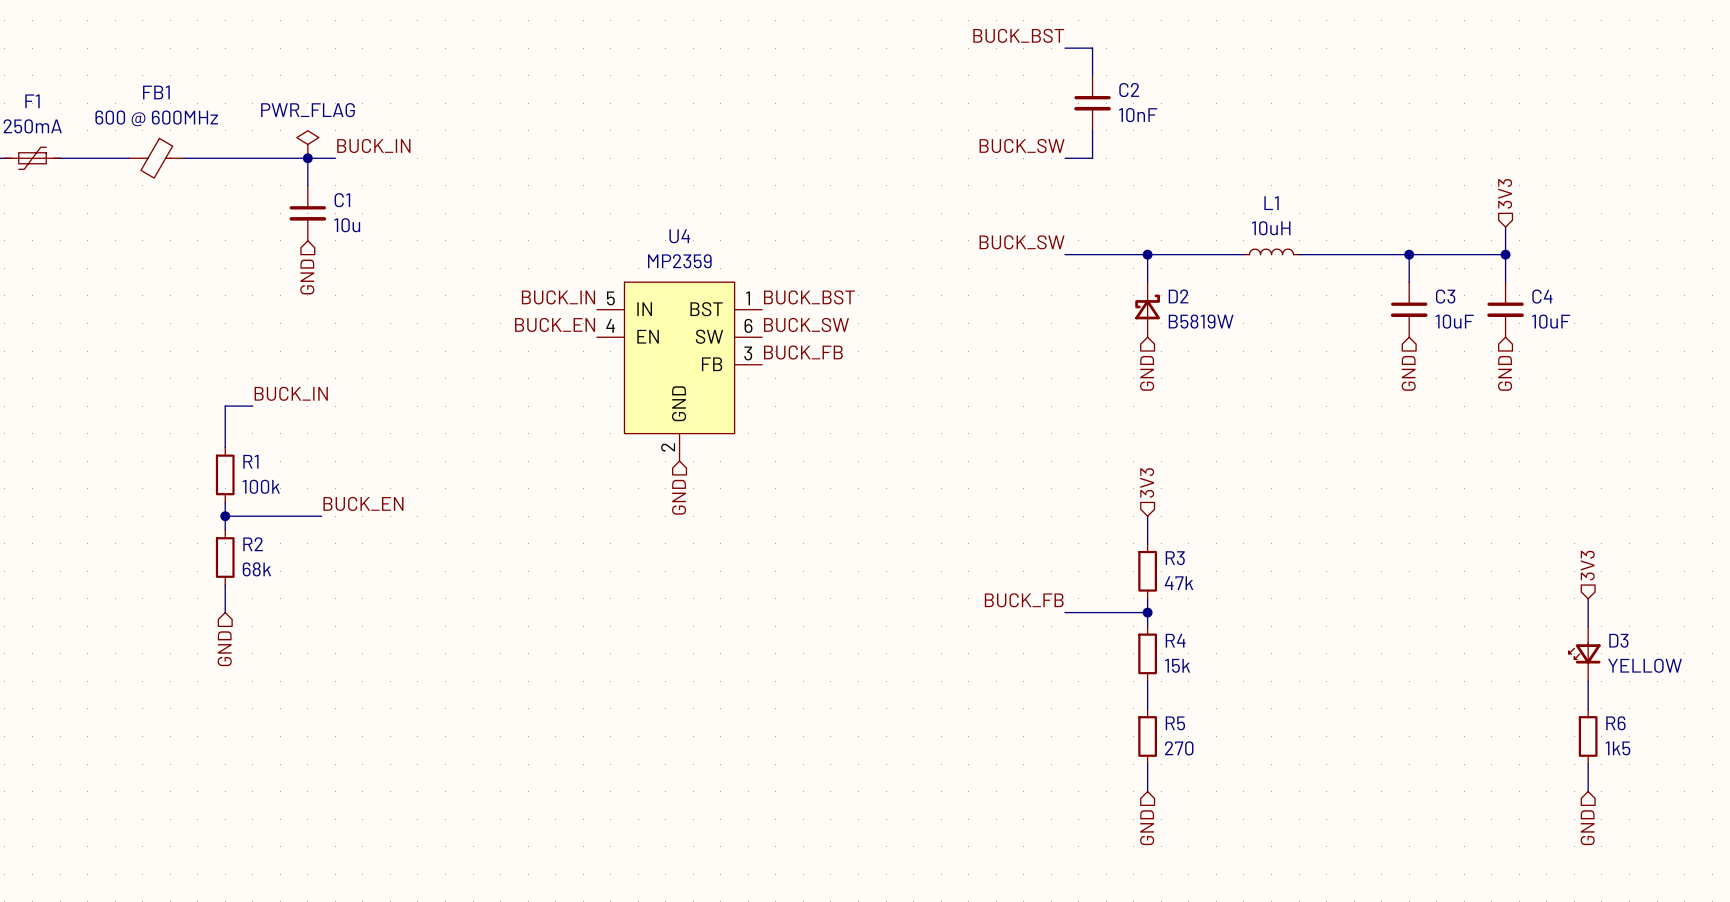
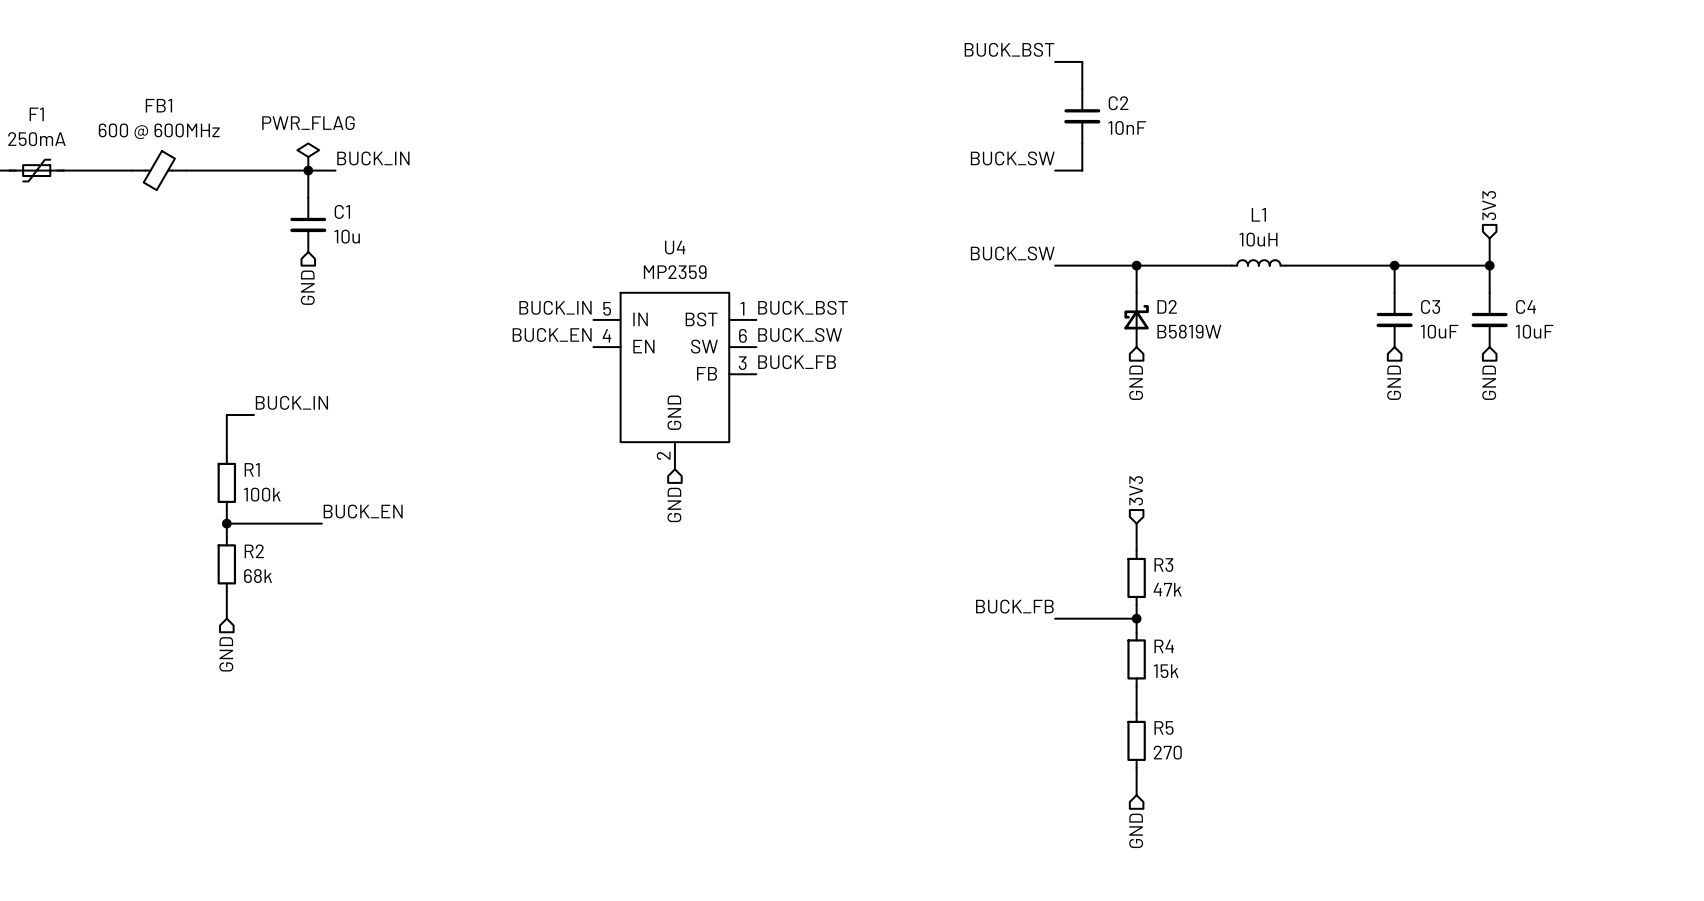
hierarchical label: 3V3 (1587, 565) -> none
wire: (1588, 598) (1588, 626) -> none
D3: YELLOW (1584, 653) -> none
wire: (1588, 681) (1588, 708) -> none
R6: 1k5 (1588, 736) -> none
wire: (1588, 764) (1588, 791) -> none
hierarchical label: GND (1587, 827) -> none

